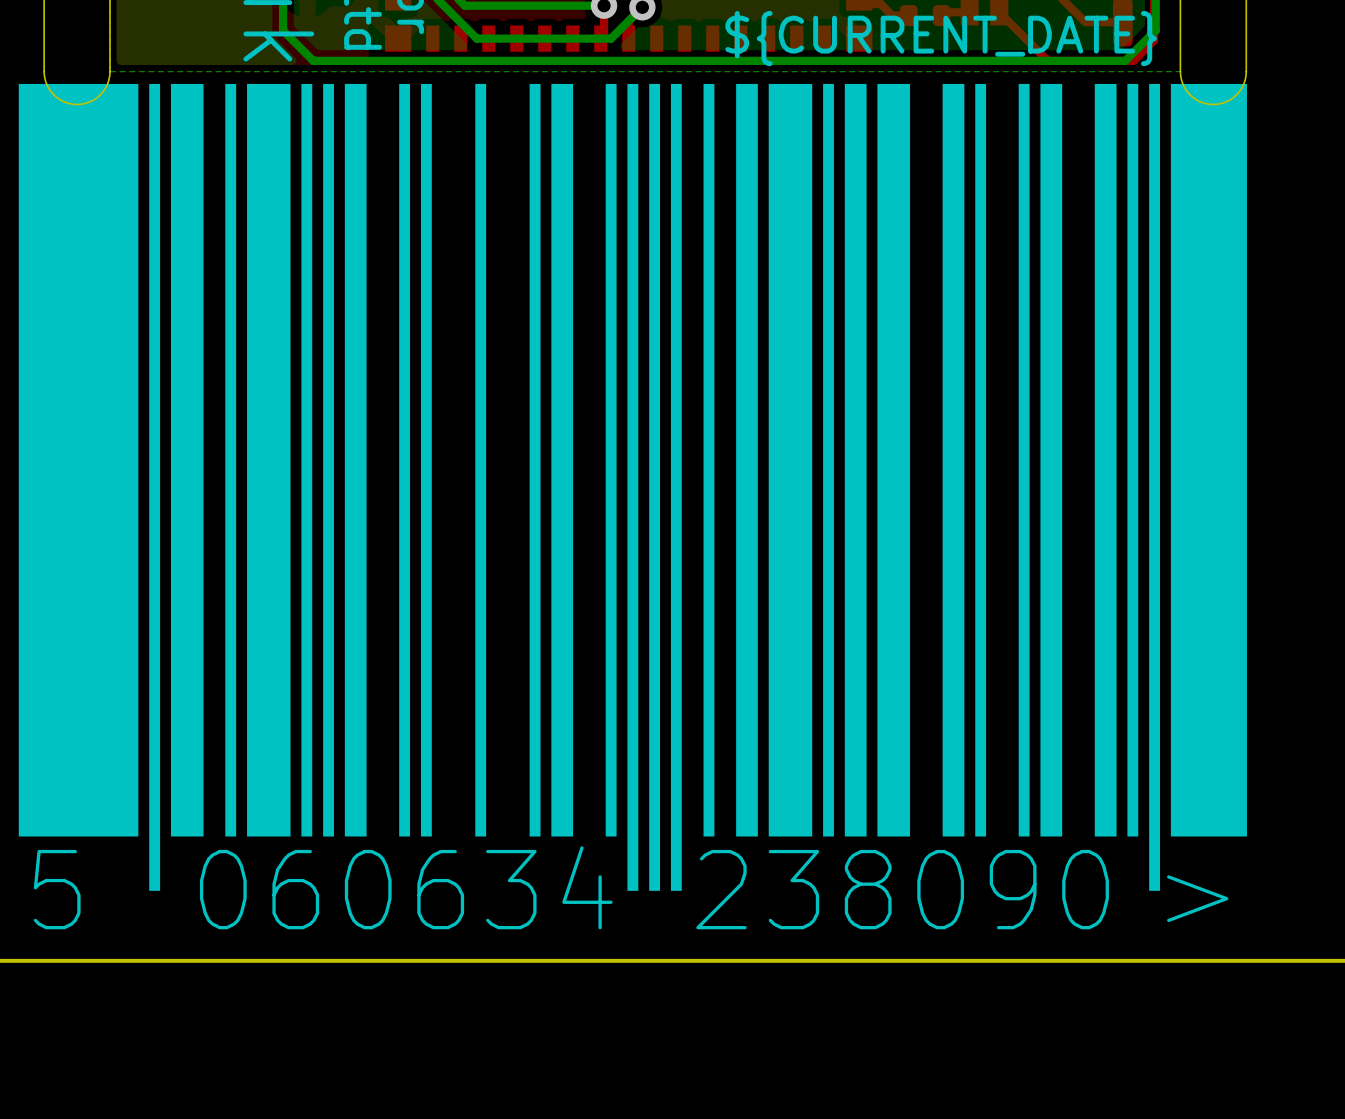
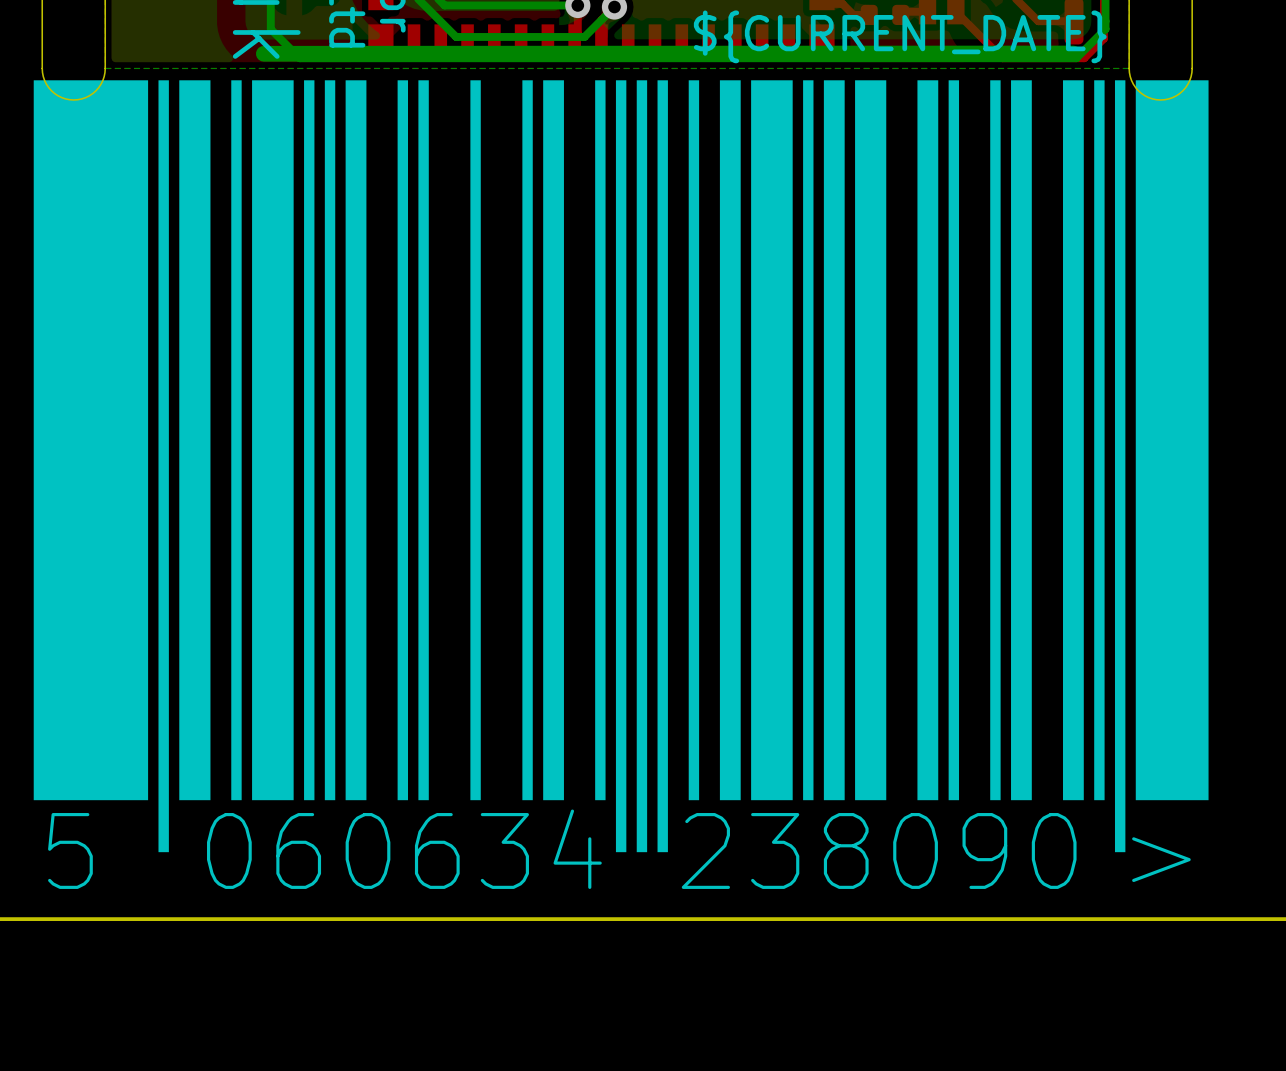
bottom track: none -> (1073, 53) (263, 53)
drawing position: (632, 487) -> (621, 466)

